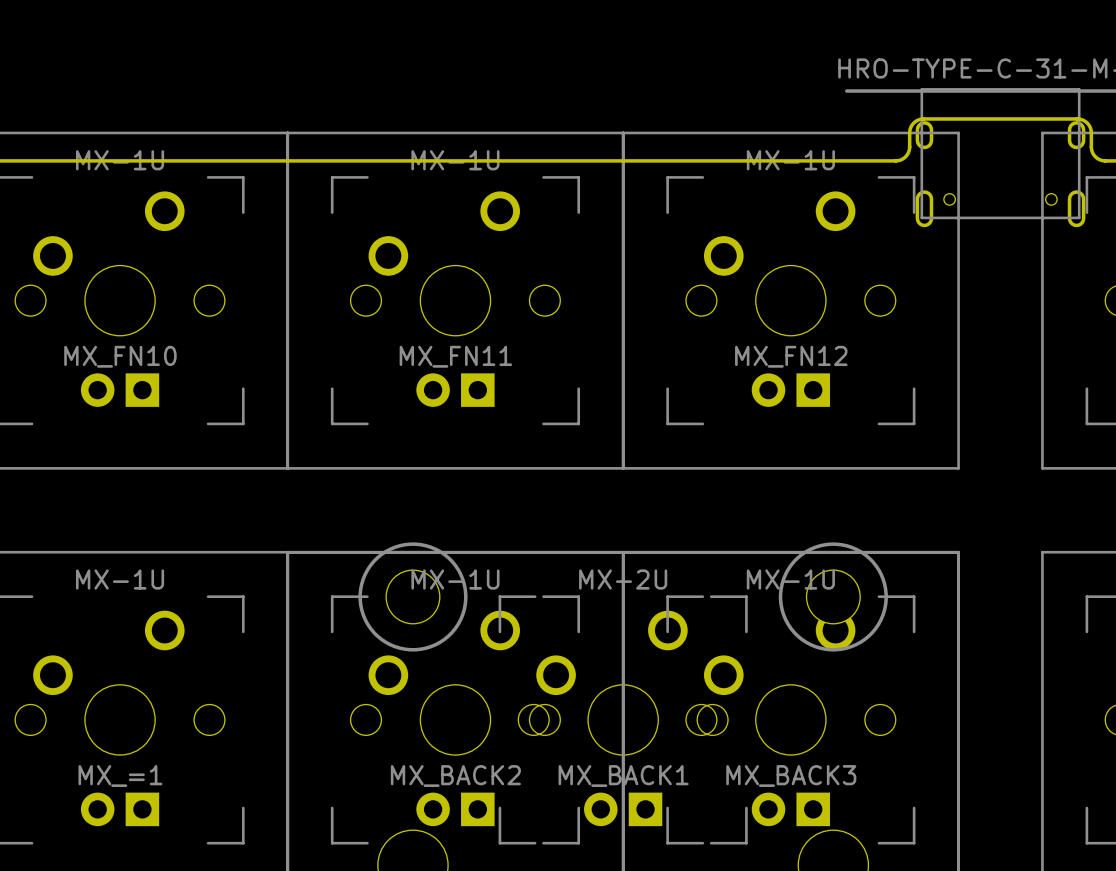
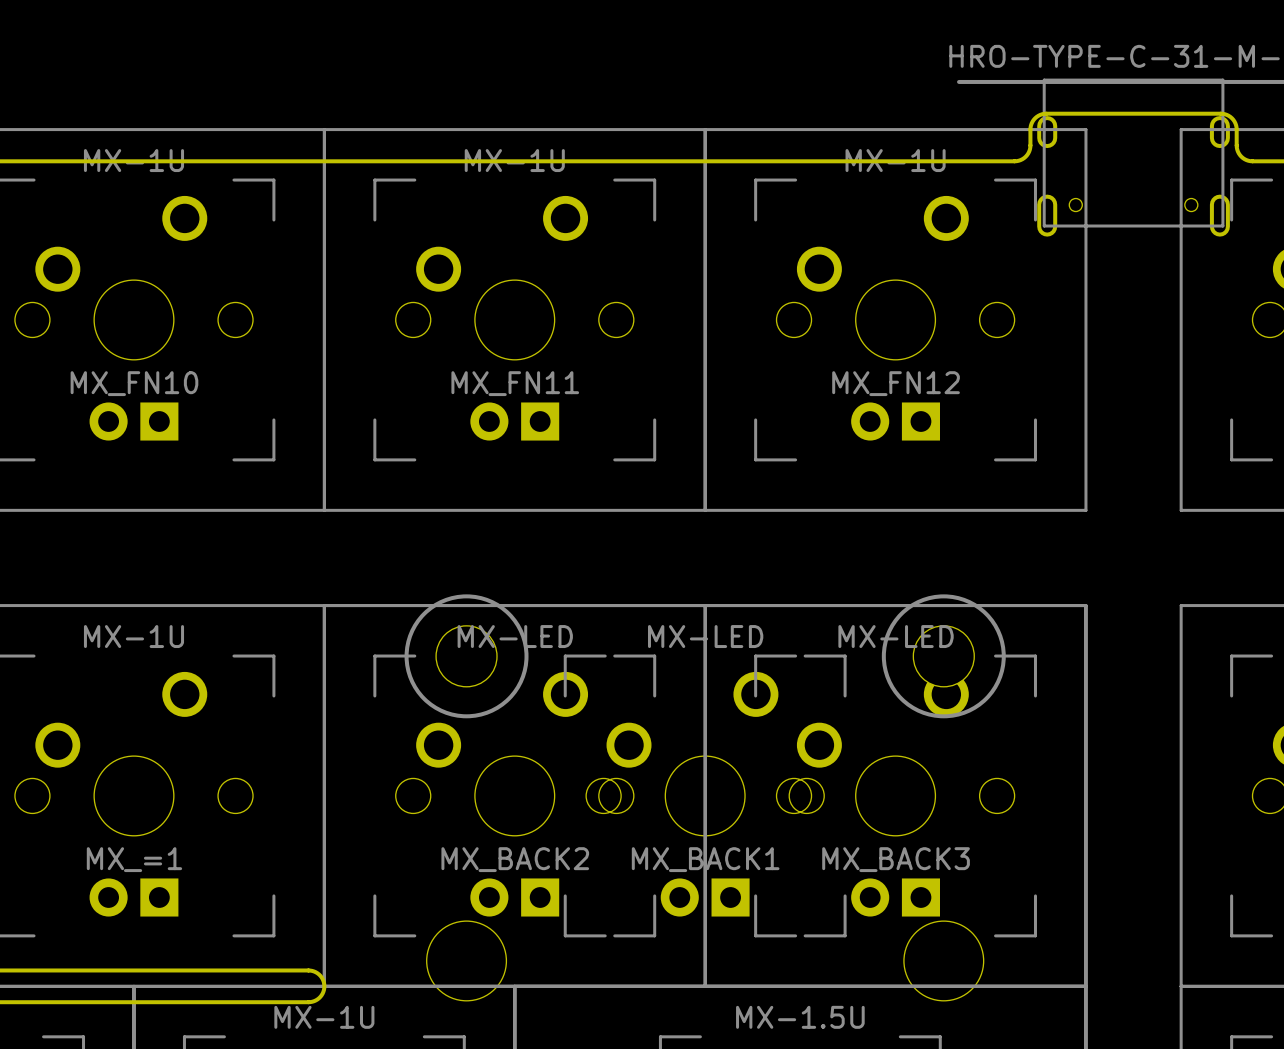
MX_BACK2 value: MX-1U (455, 579) -> MX-LED (515, 636)
MX_BACK1 value: MX-2U (623, 579) -> MX-LED (705, 636)
MX_BACK3 value: MX-1U (790, 579) -> MX-LED (896, 636)

